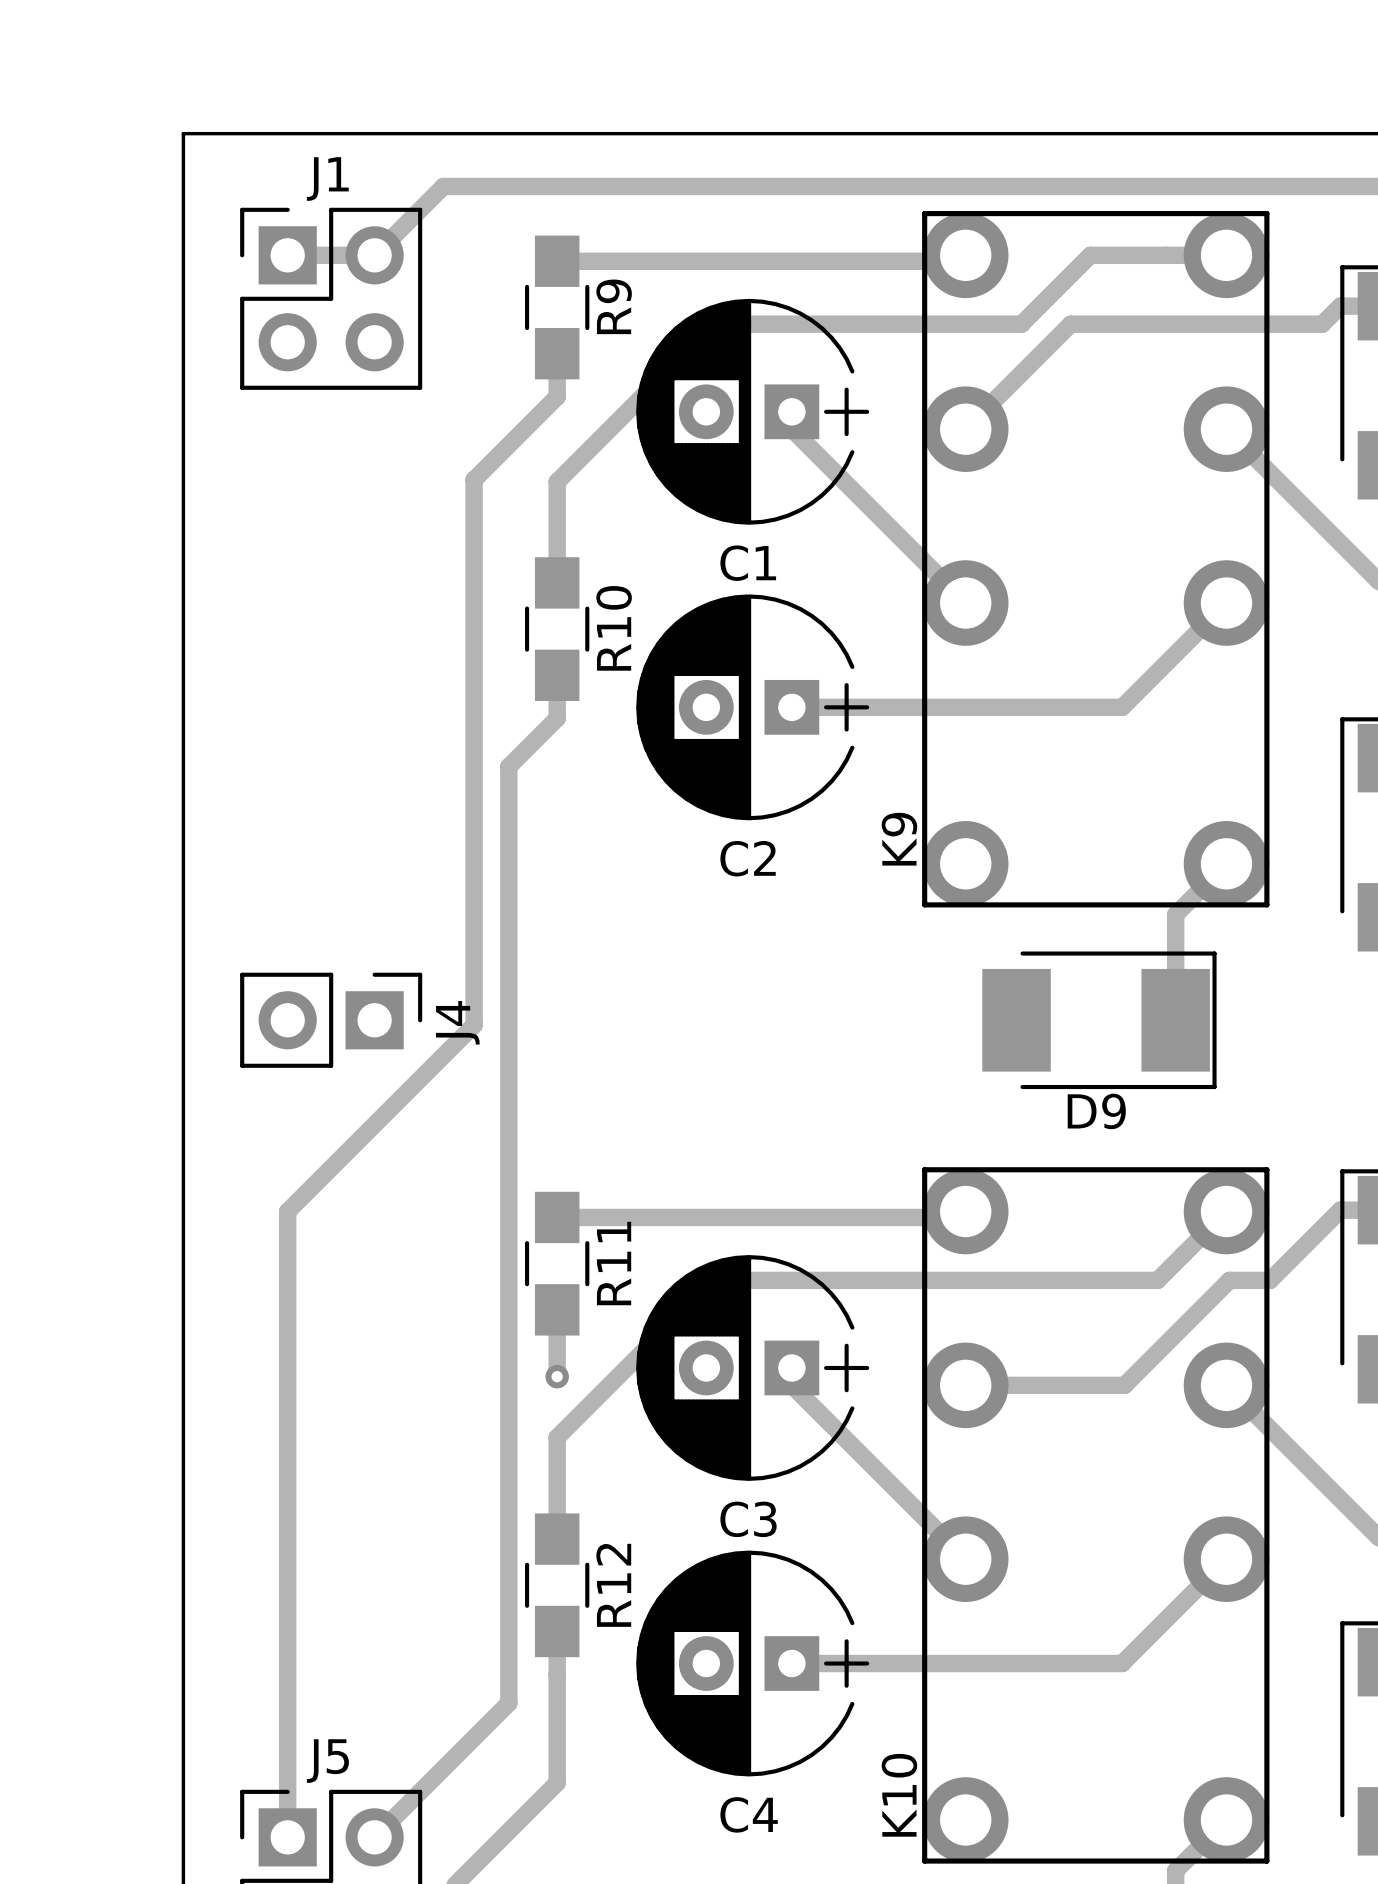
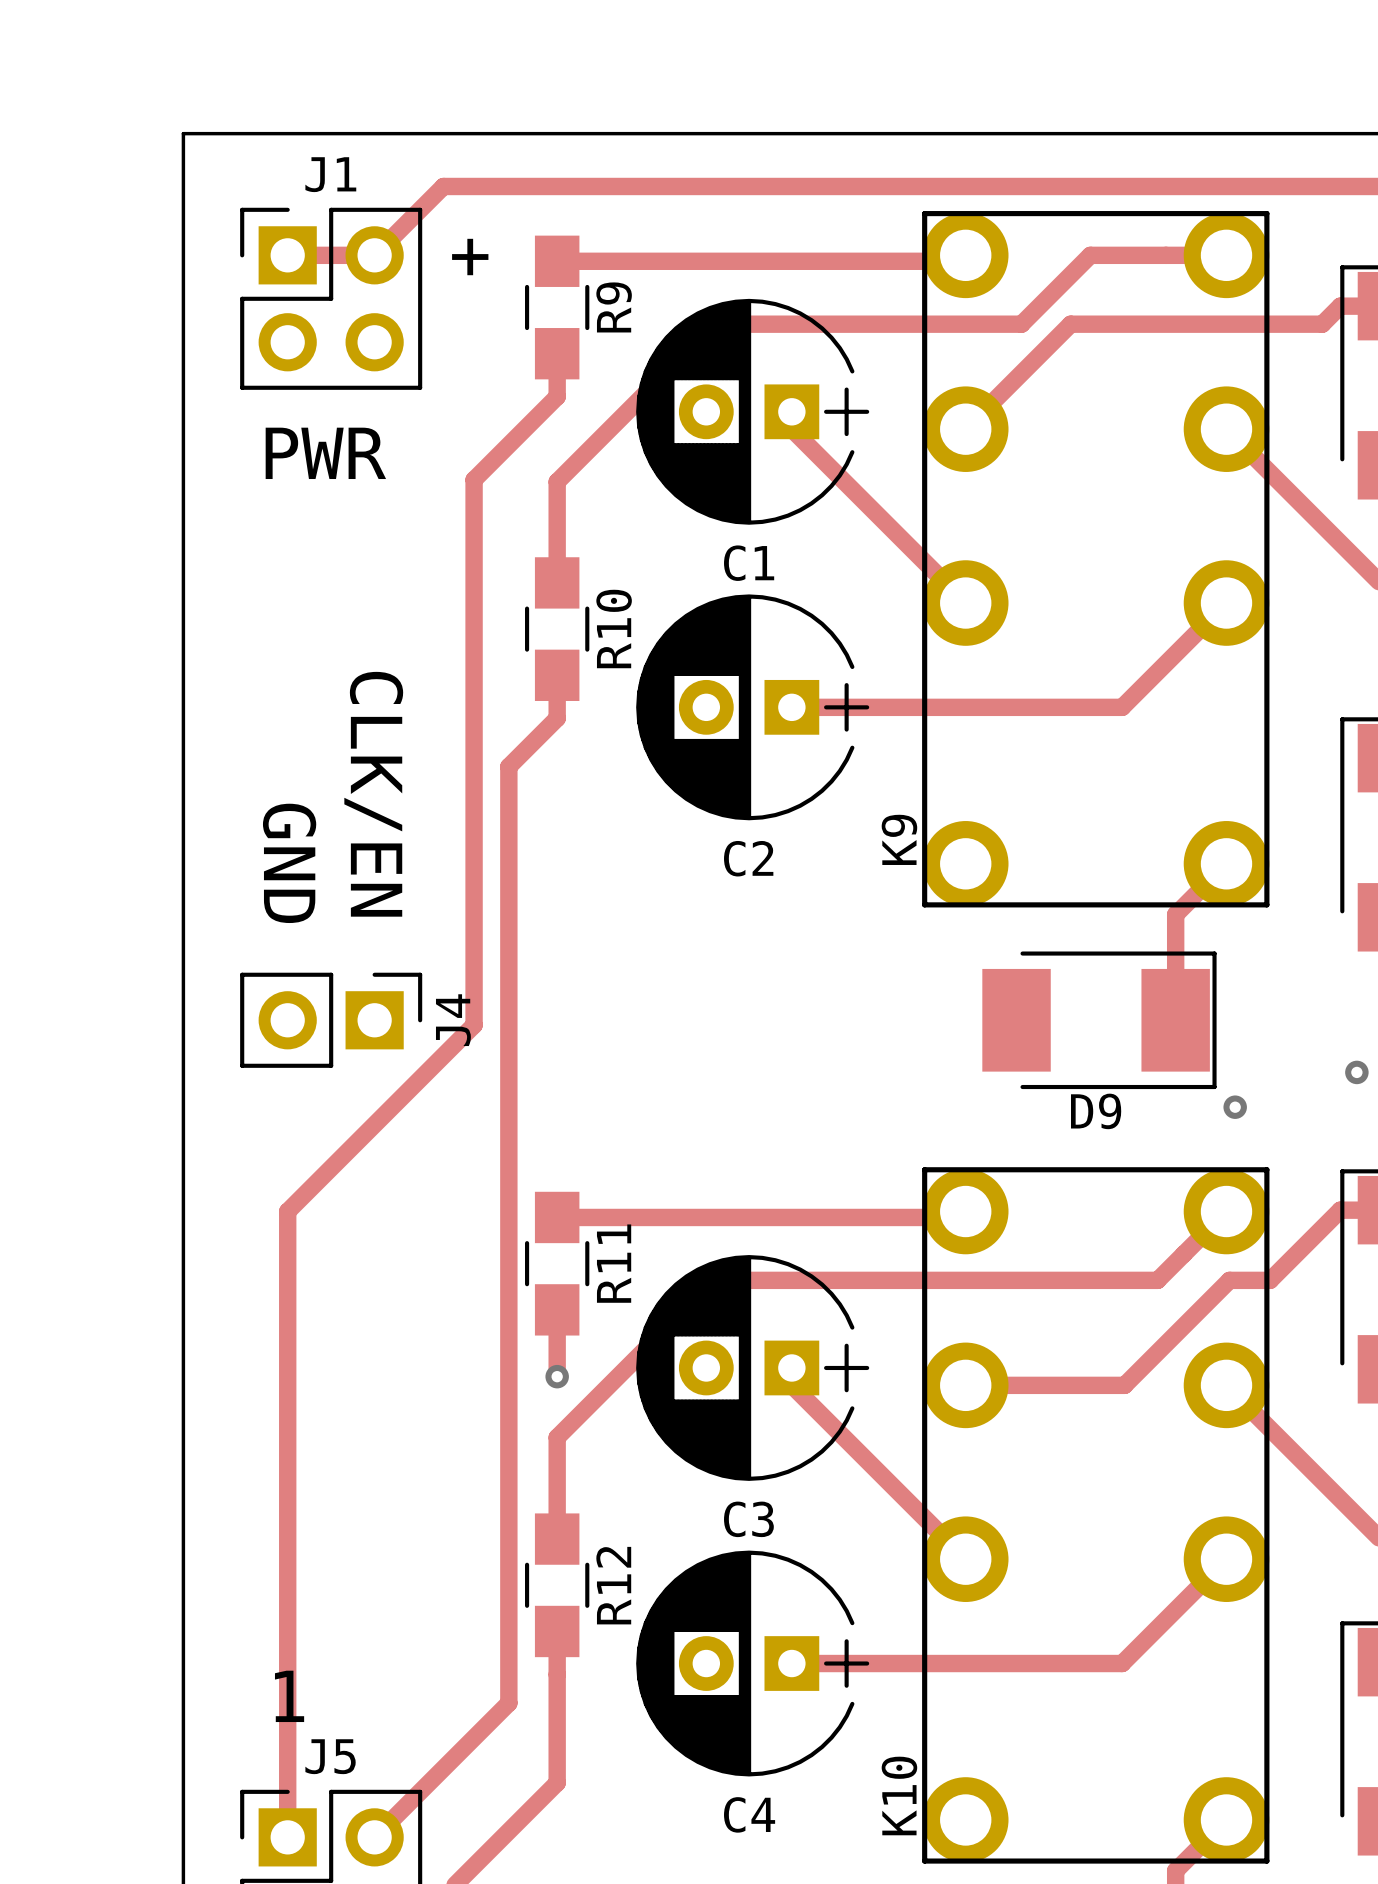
text: none -> + (470, 257)
text: none -> PWR (325, 453)
text: none -> CLK/EN (373, 794)
text: none -> GND (289, 863)
via: none -> (1356, 1072)
via: none -> (1235, 1107)
text: none -> 1 (289, 1696)

